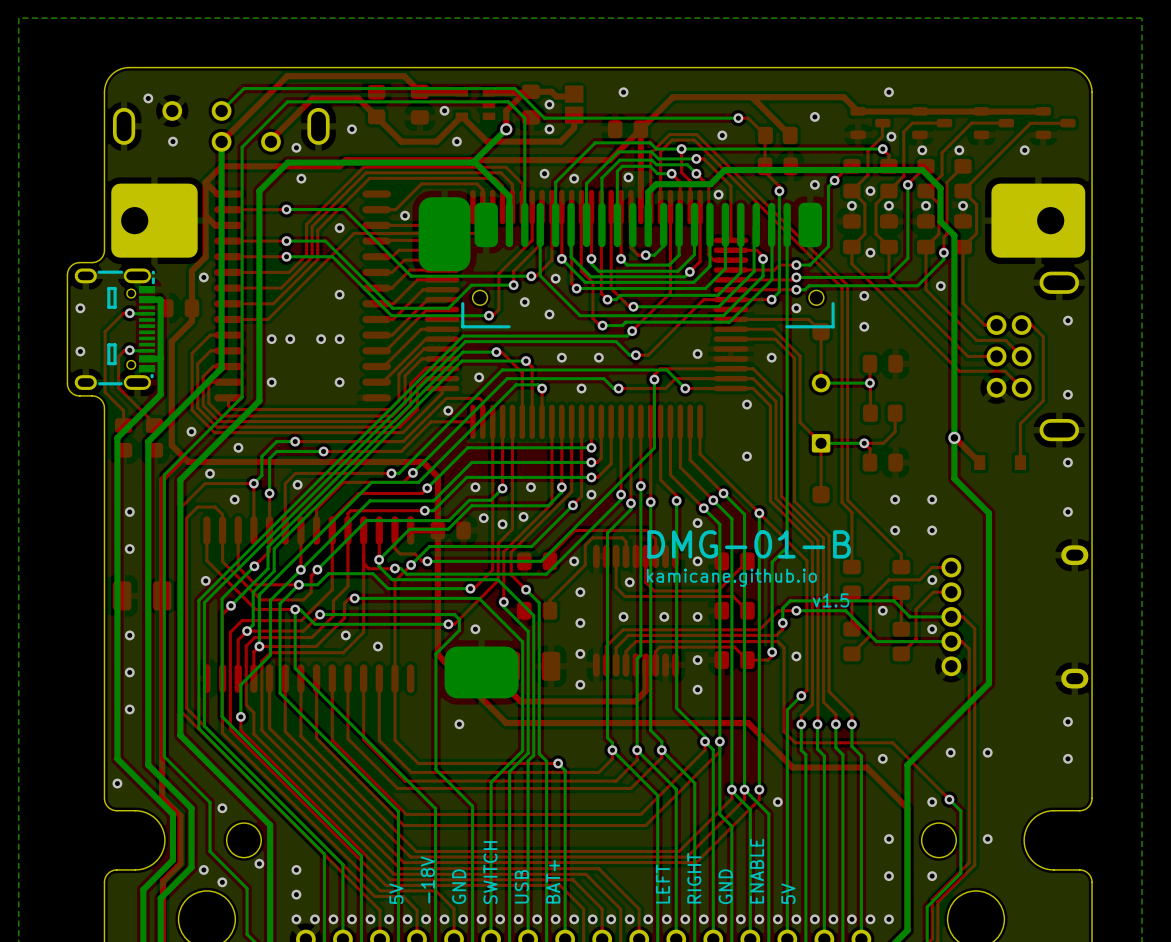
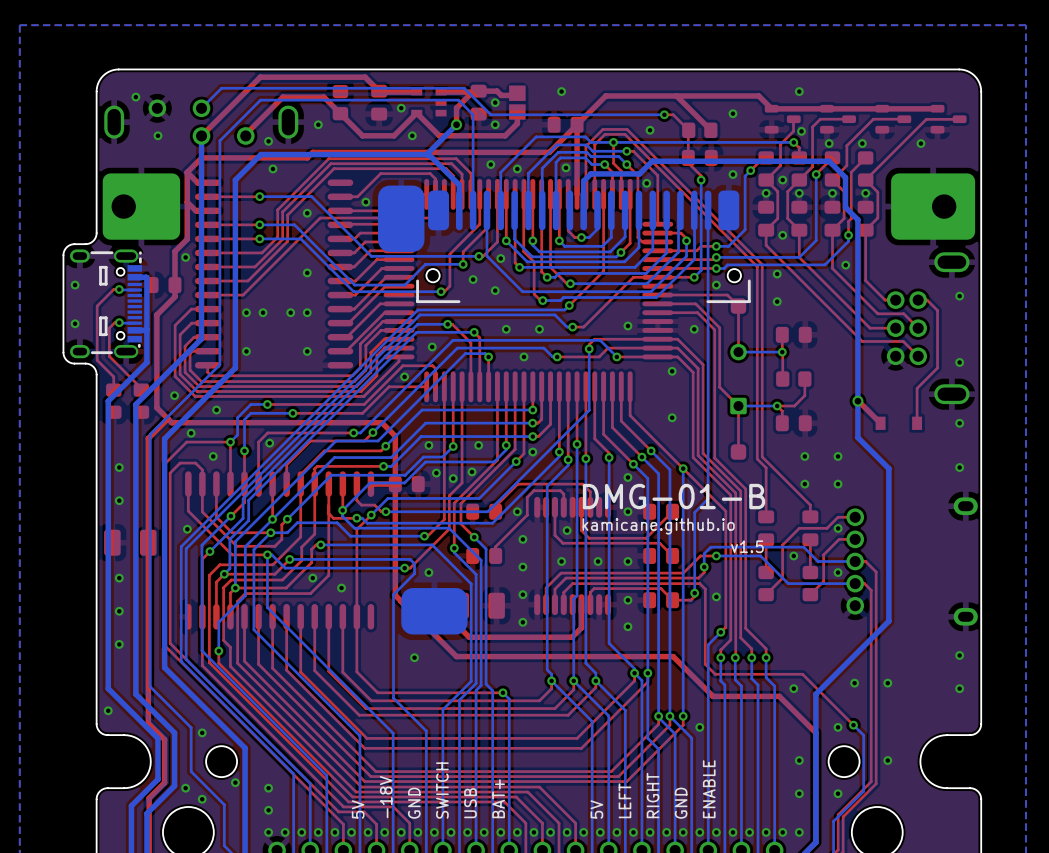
text: ENABLE (757, 871) -> GND (681, 803)
text: RIGHT (694, 878) -> LEFT (624, 800)
text: LEFT (662, 884) -> 5V (596, 809)
text: GND (725, 886) -> RIGHT (653, 795)
text: 5V (788, 893) -> ENABLE (709, 789)

